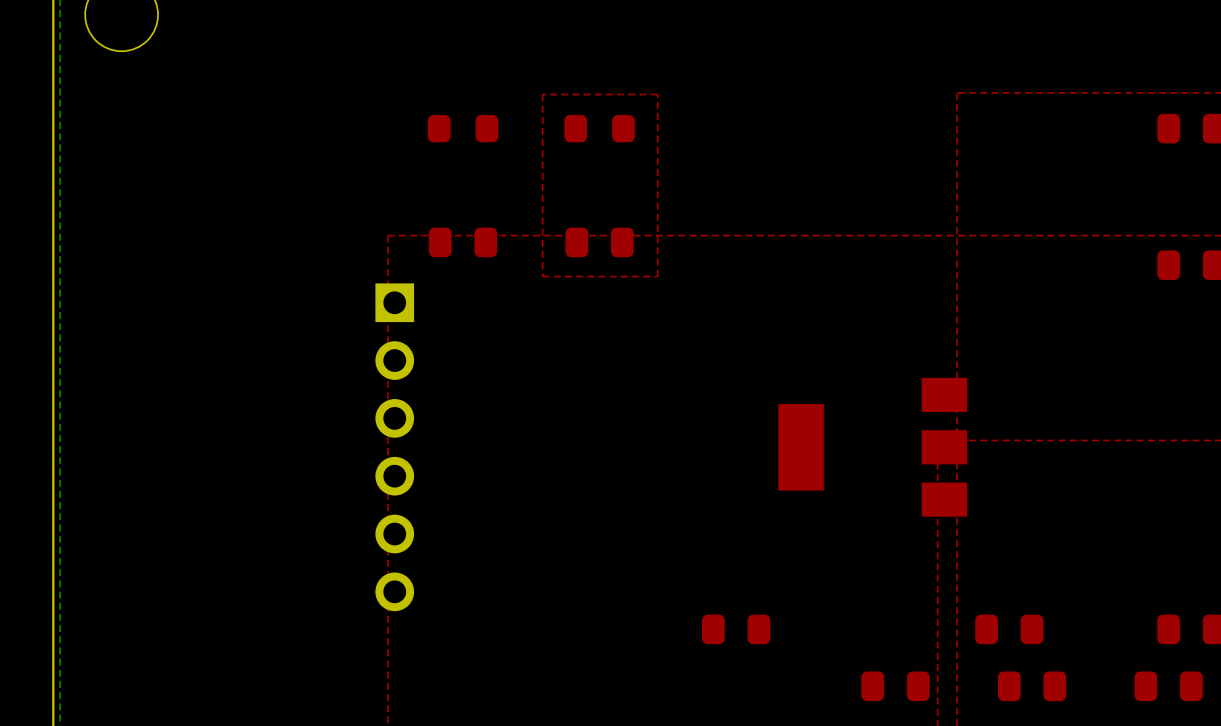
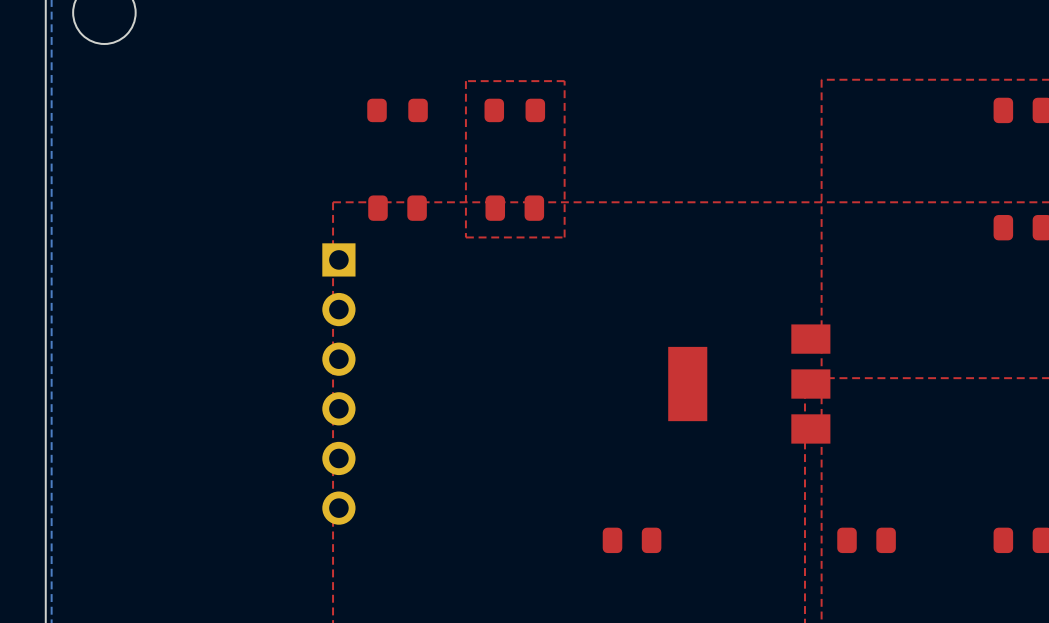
part: (895, 686) -> none
part: (1032, 686) -> none
part: (1168, 686) -> none

